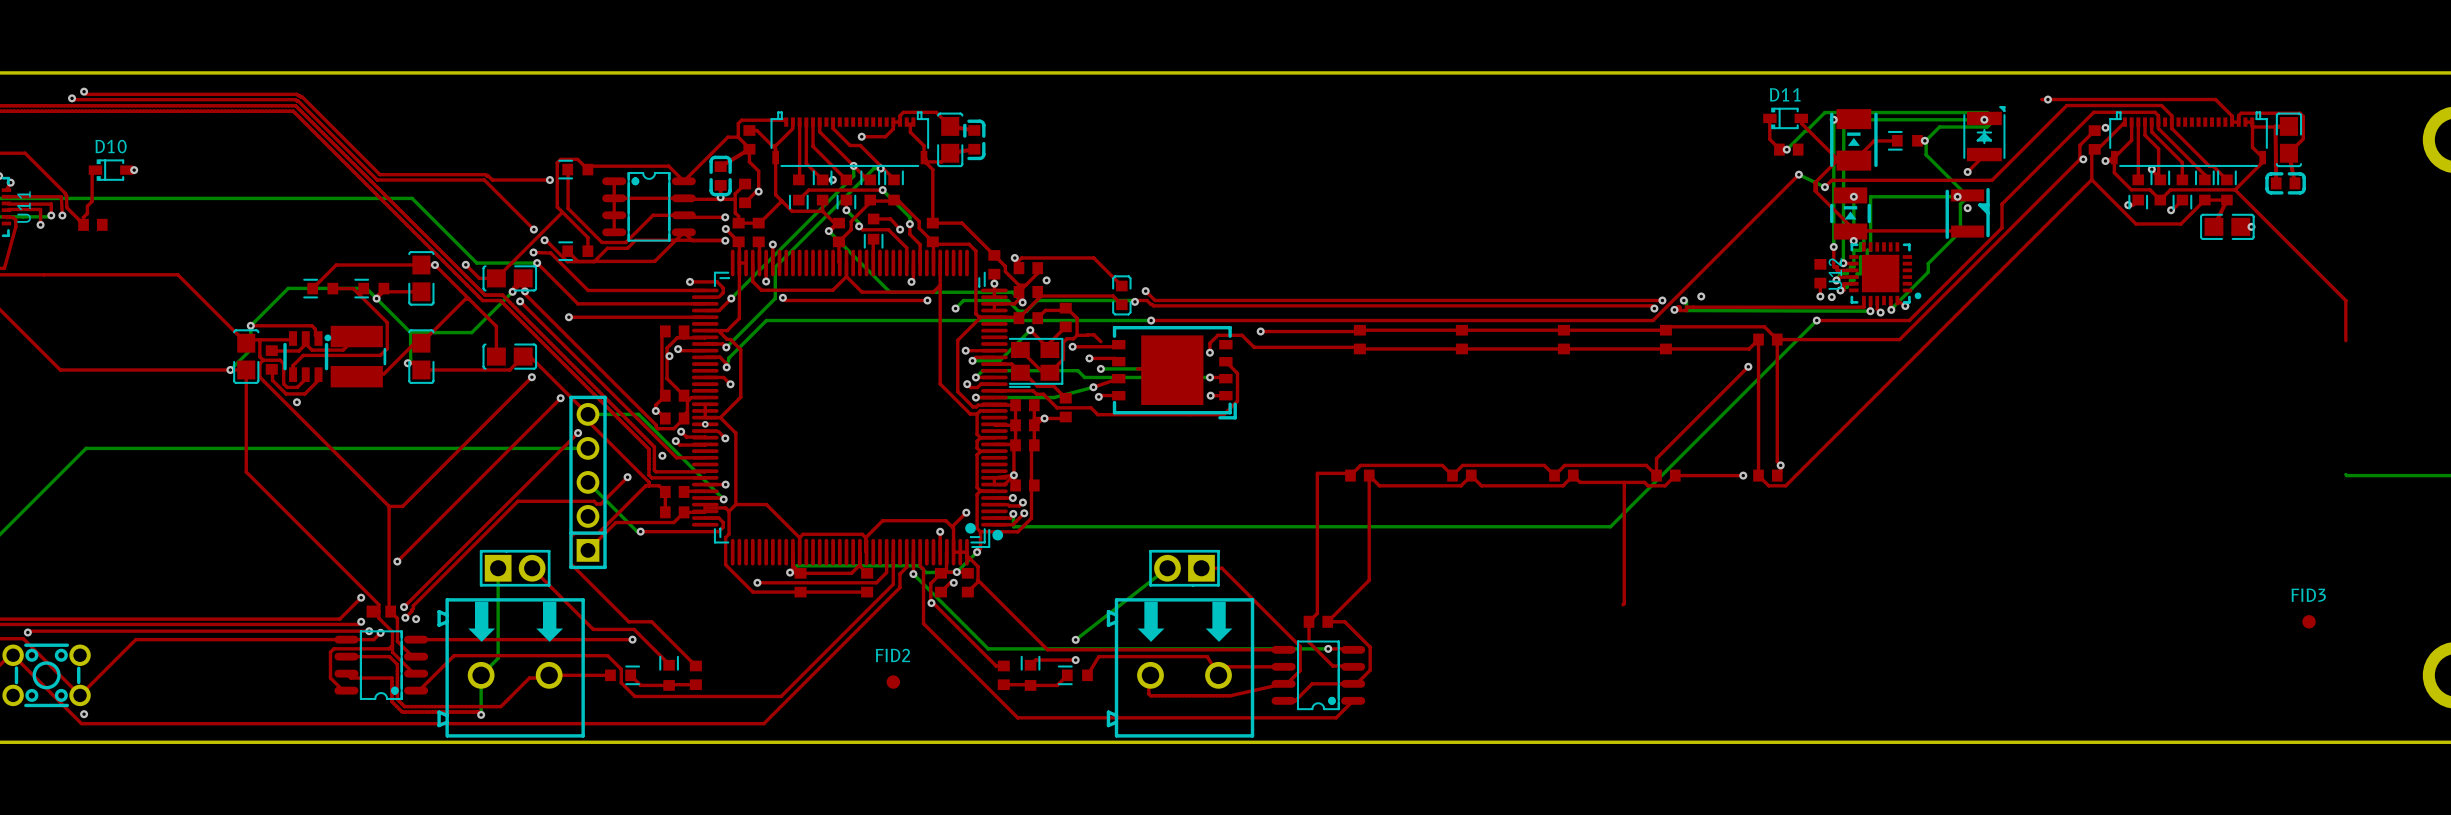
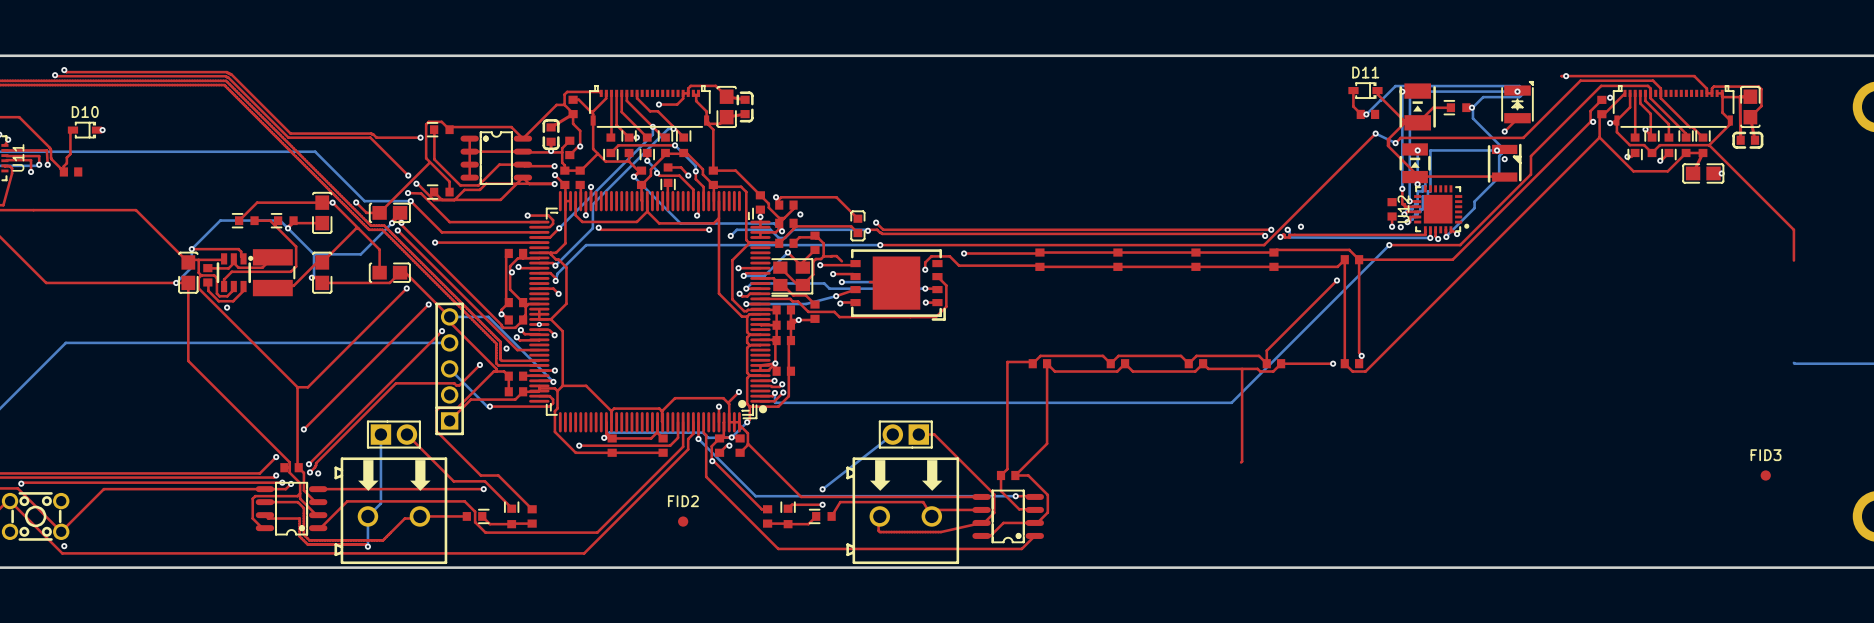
D11 rotation: 0° (1785, 118) -> 180° (1365, 90)
D10 rotation: 0° (111, 170) -> 180° (84, 130)

